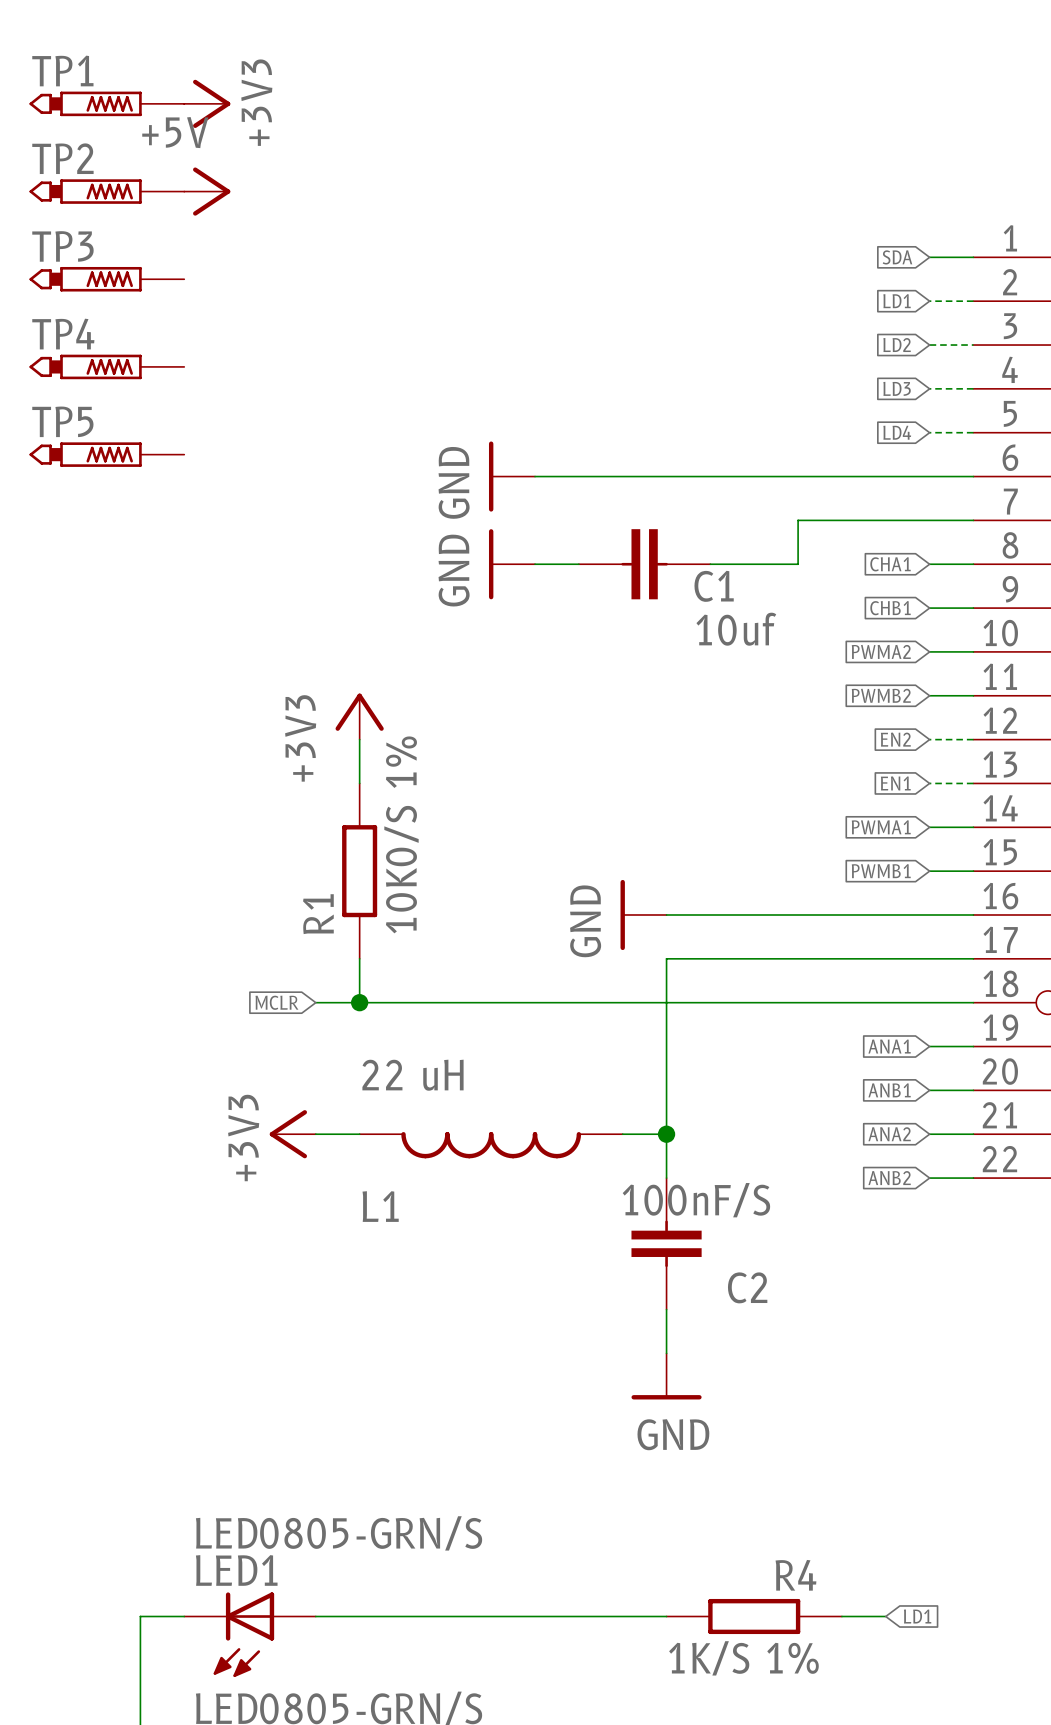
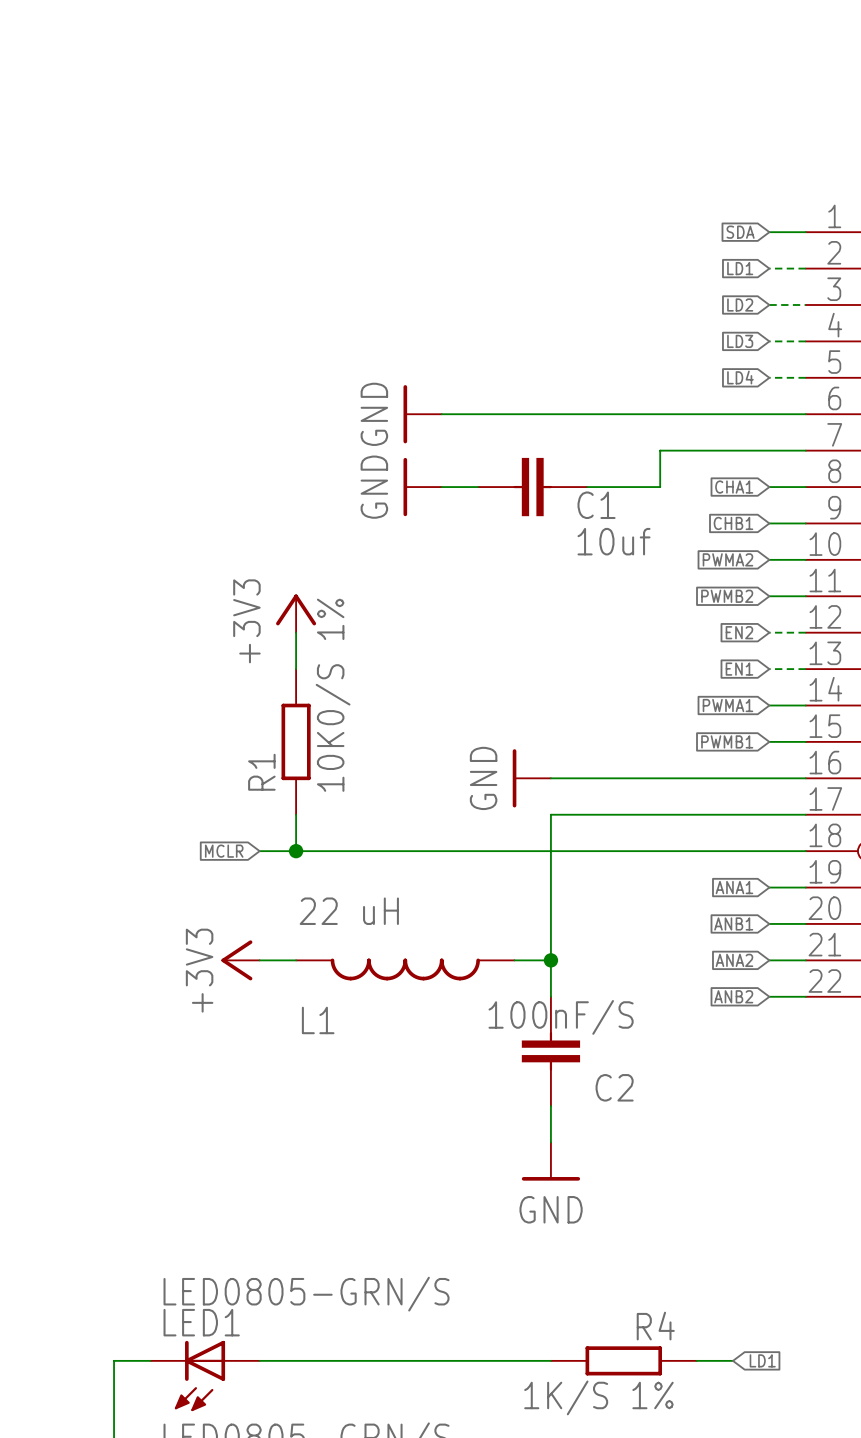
TP1: (106, 103) -> none
power symbol: +3V3 (207, 103) -> none
TP2: (106, 191) -> none
power symbol: +5V (207, 191) -> none
TP3: (106, 279) -> none
TP4: (106, 366) -> none
TP5: (106, 454) -> none

